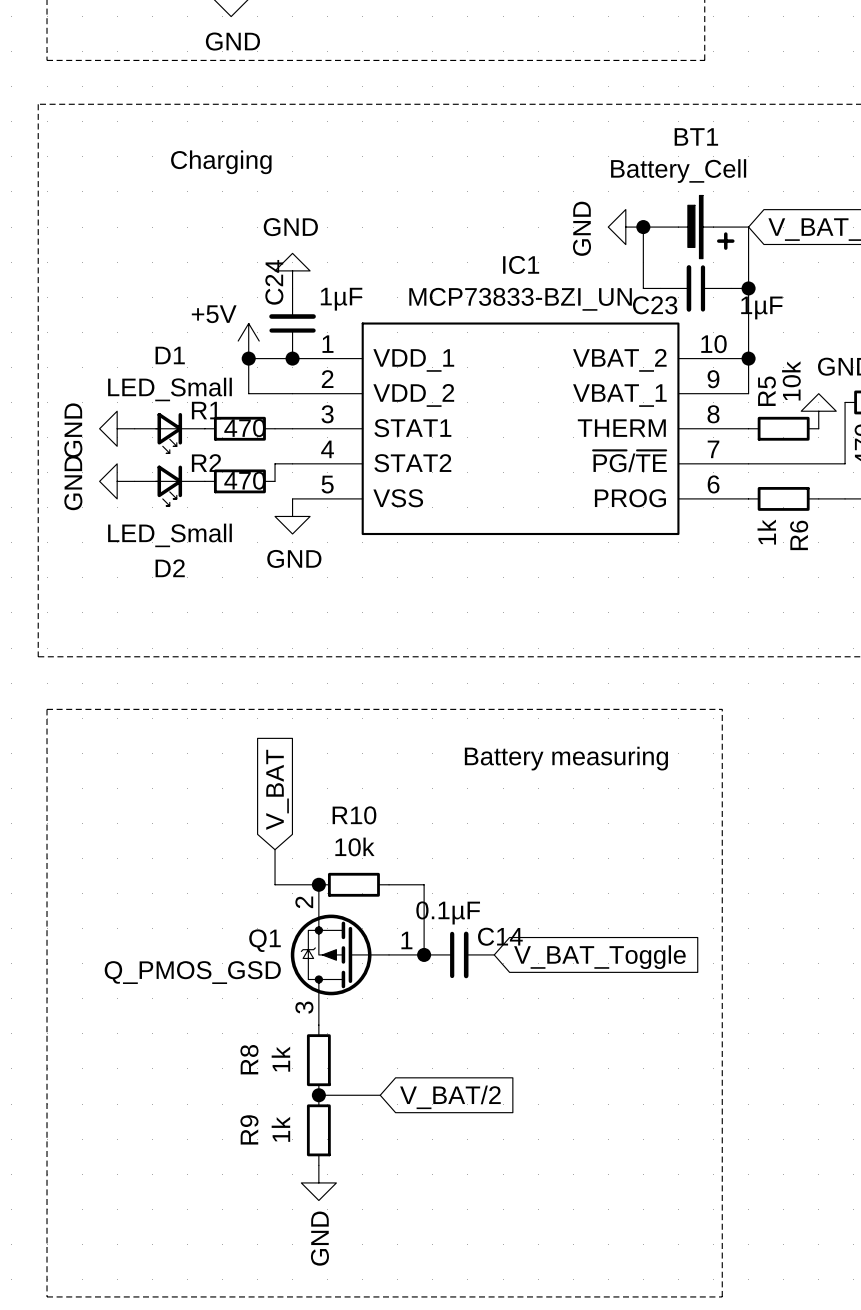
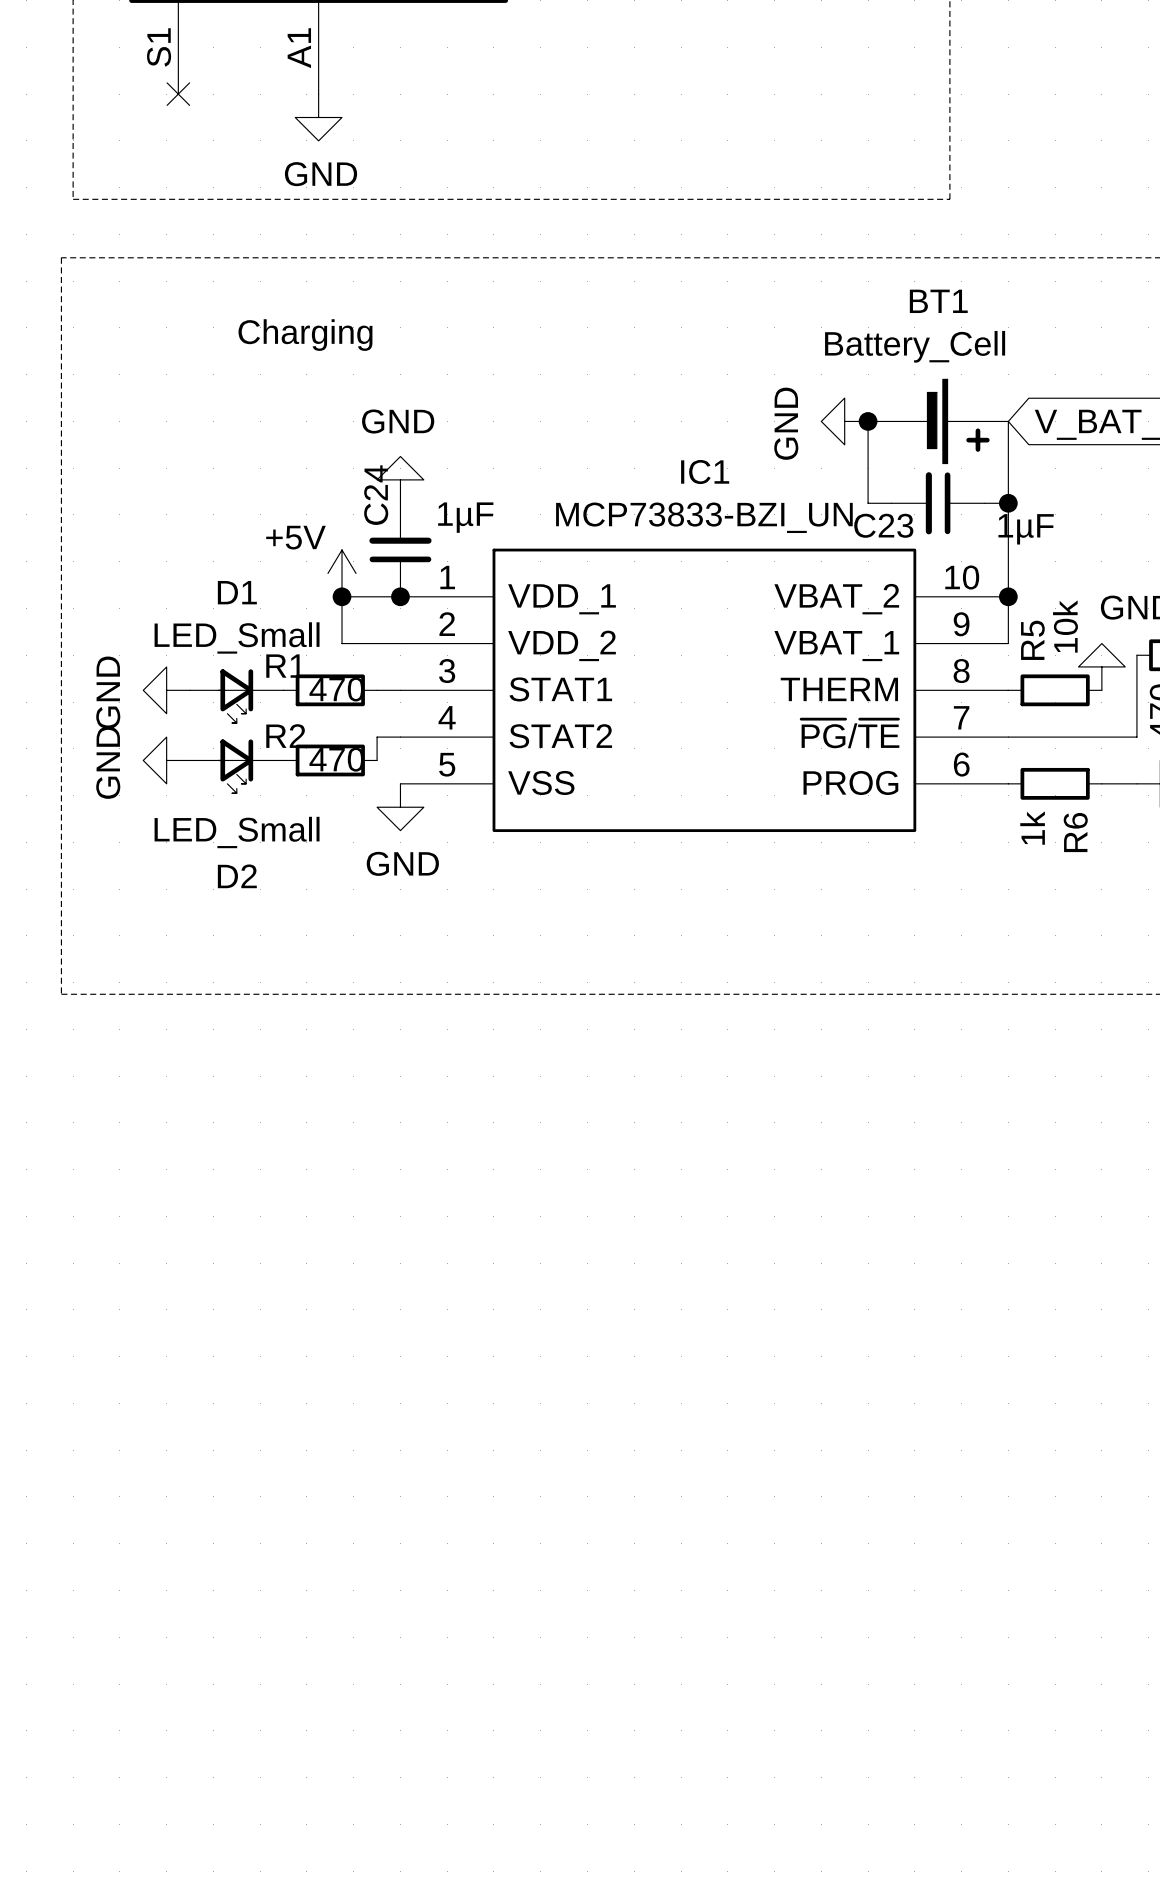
line: (47, 709) (47, 1296) (722, 1296) (722, 709) (47, 709) -> none
text: Battery measuring (566, 758) -> none
global label: V_BAT (277, 789) -> none
wire: (275, 849) (275, 884) (318, 884) -> none
junction: (318, 884) -> none
R10: 10k (353, 884) -> none
wire: (389, 884) (424, 884) (424, 954) -> none
Q1: Q_PMOS_GSD (357, 954) -> none
junction: (424, 954) -> none
C14: 0.1µF (459, 954) -> none
global label: V_BAT_Toggle (599, 957) -> none
R8: 1k (318, 1060) -> none
wire: (318, 1095) (380, 1095) -> none
junction: (318, 1095) -> none
global label: V_BAT/2 (450, 1097) -> none
R9: 1k (318, 1130) -> none
power symbol: GND (318, 1182) -> none

